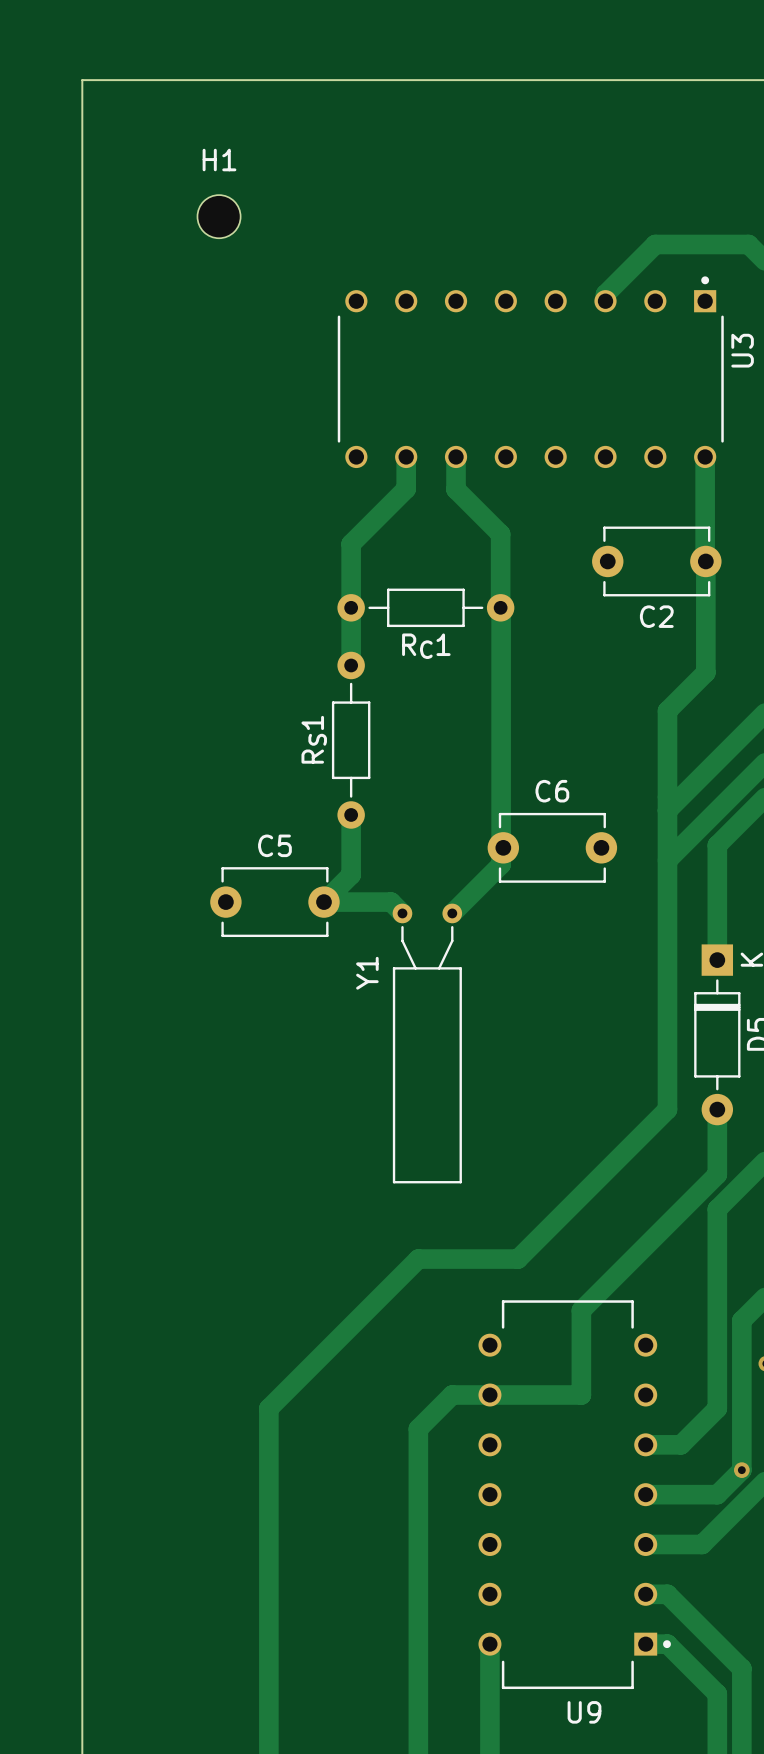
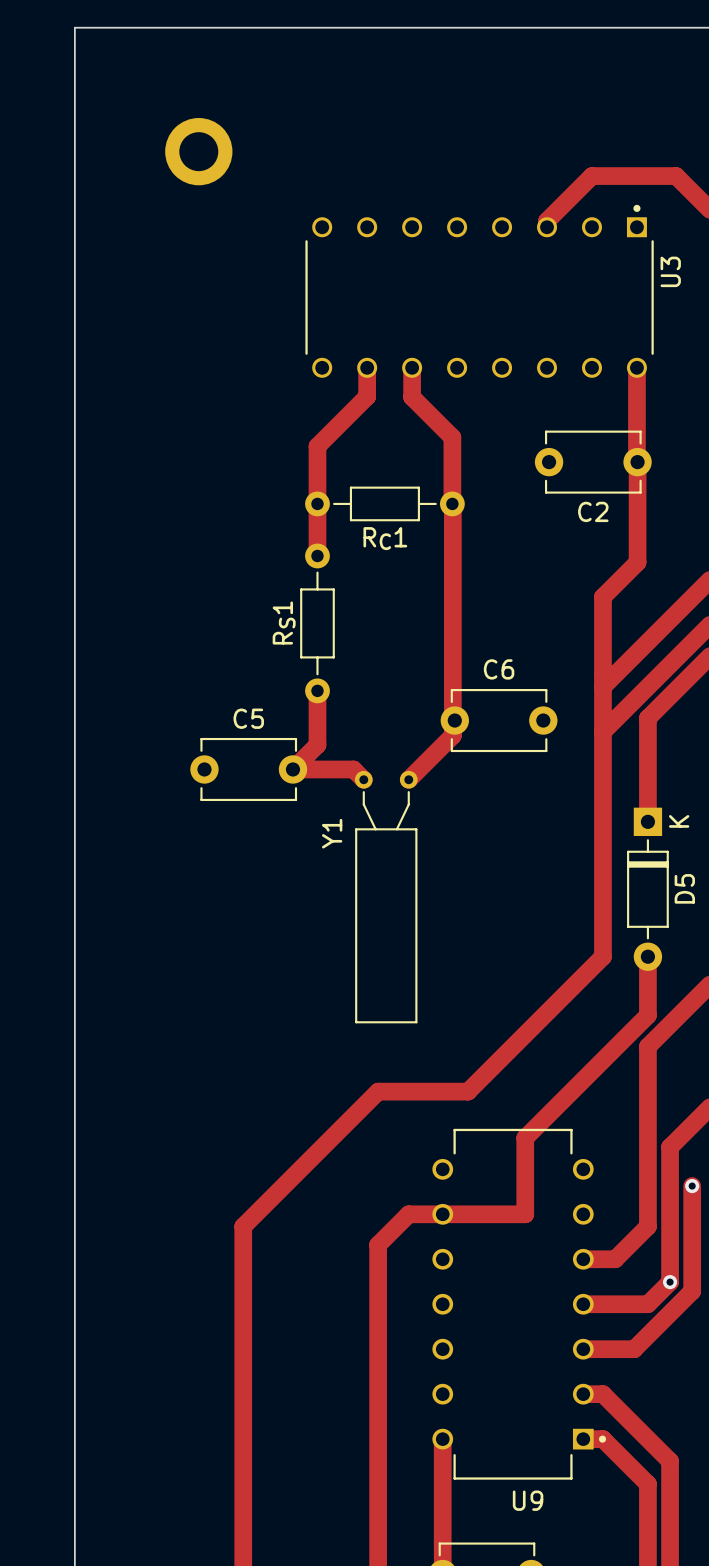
H1: (219, 216) -> none
part: none -> (198, 151)

